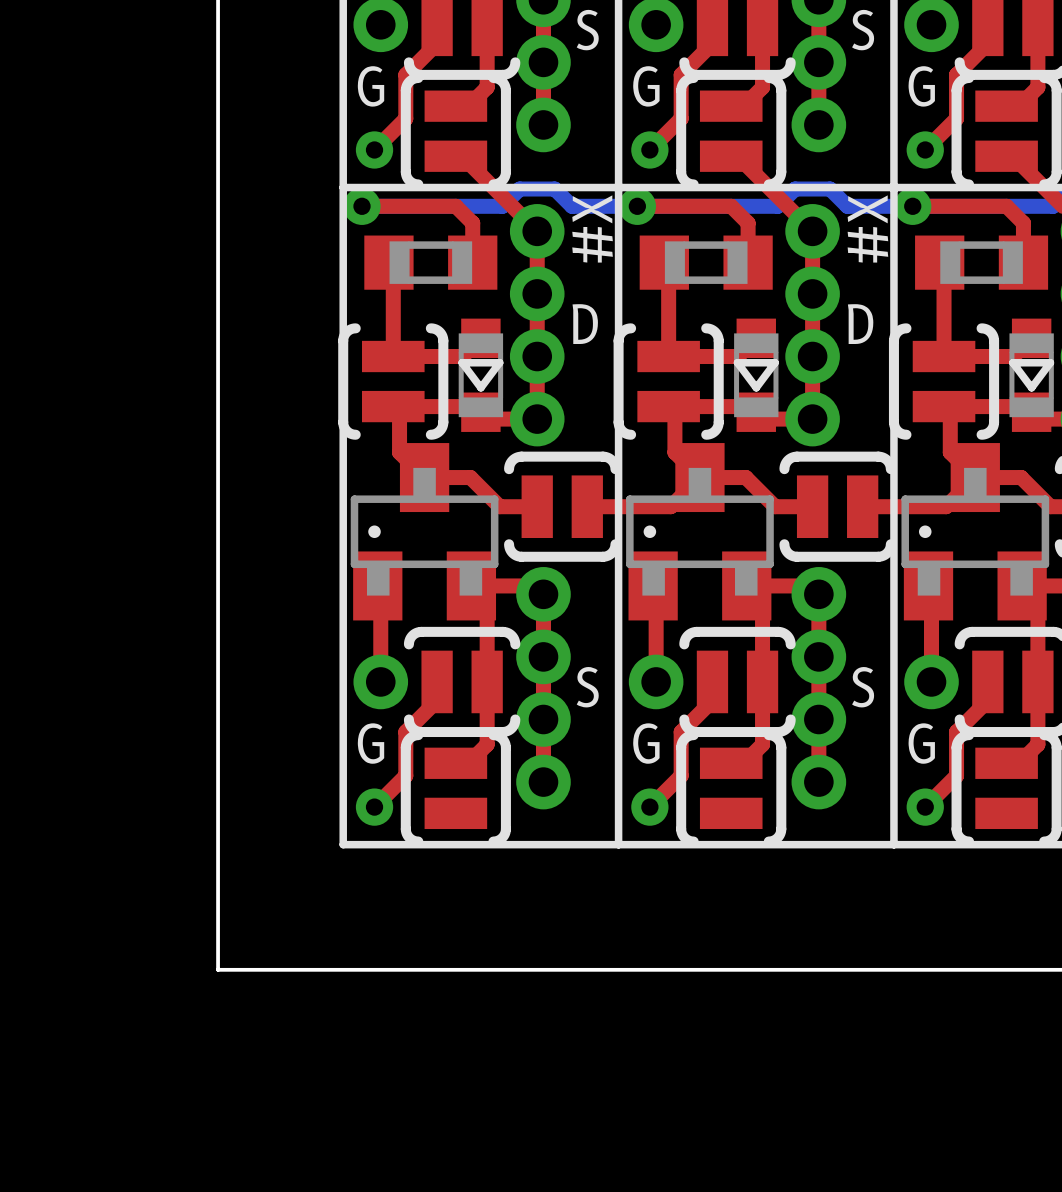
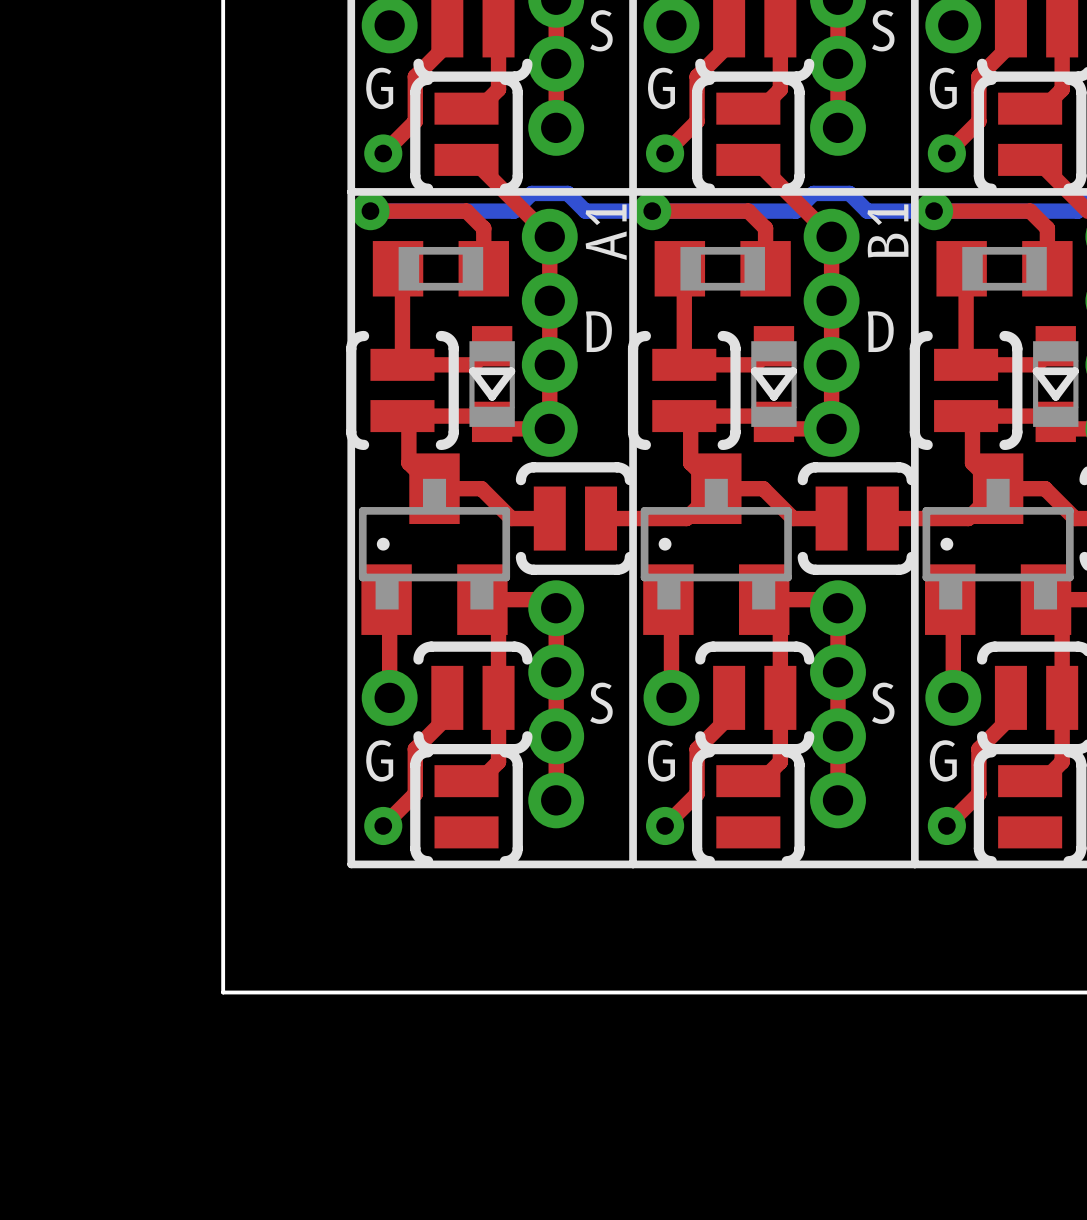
text: #X (592, 228) -> A1 (606, 232)
text: #X (867, 228) -> B1 (887, 230)

